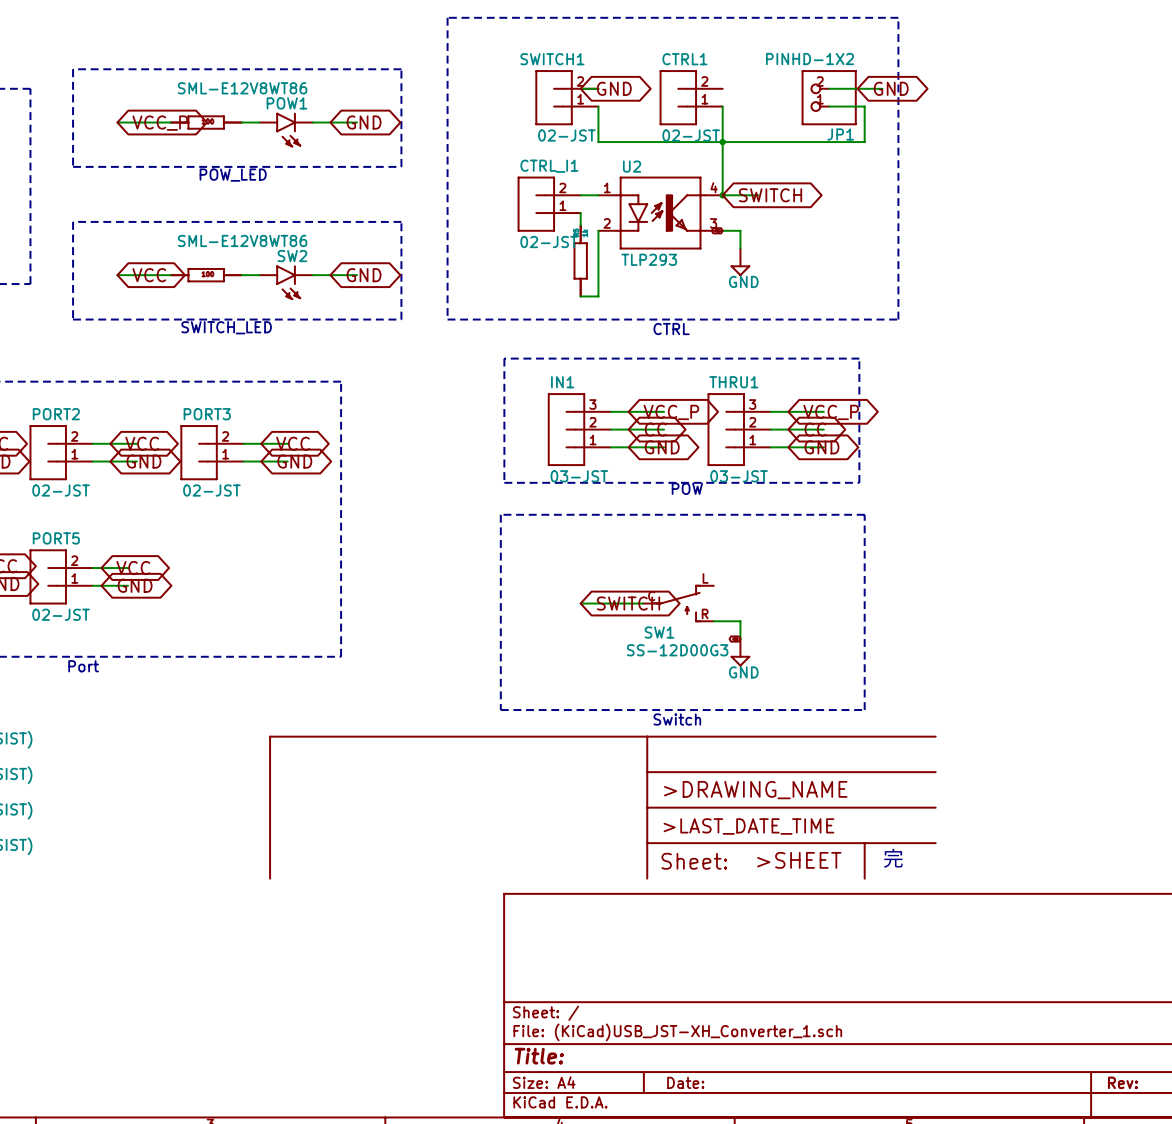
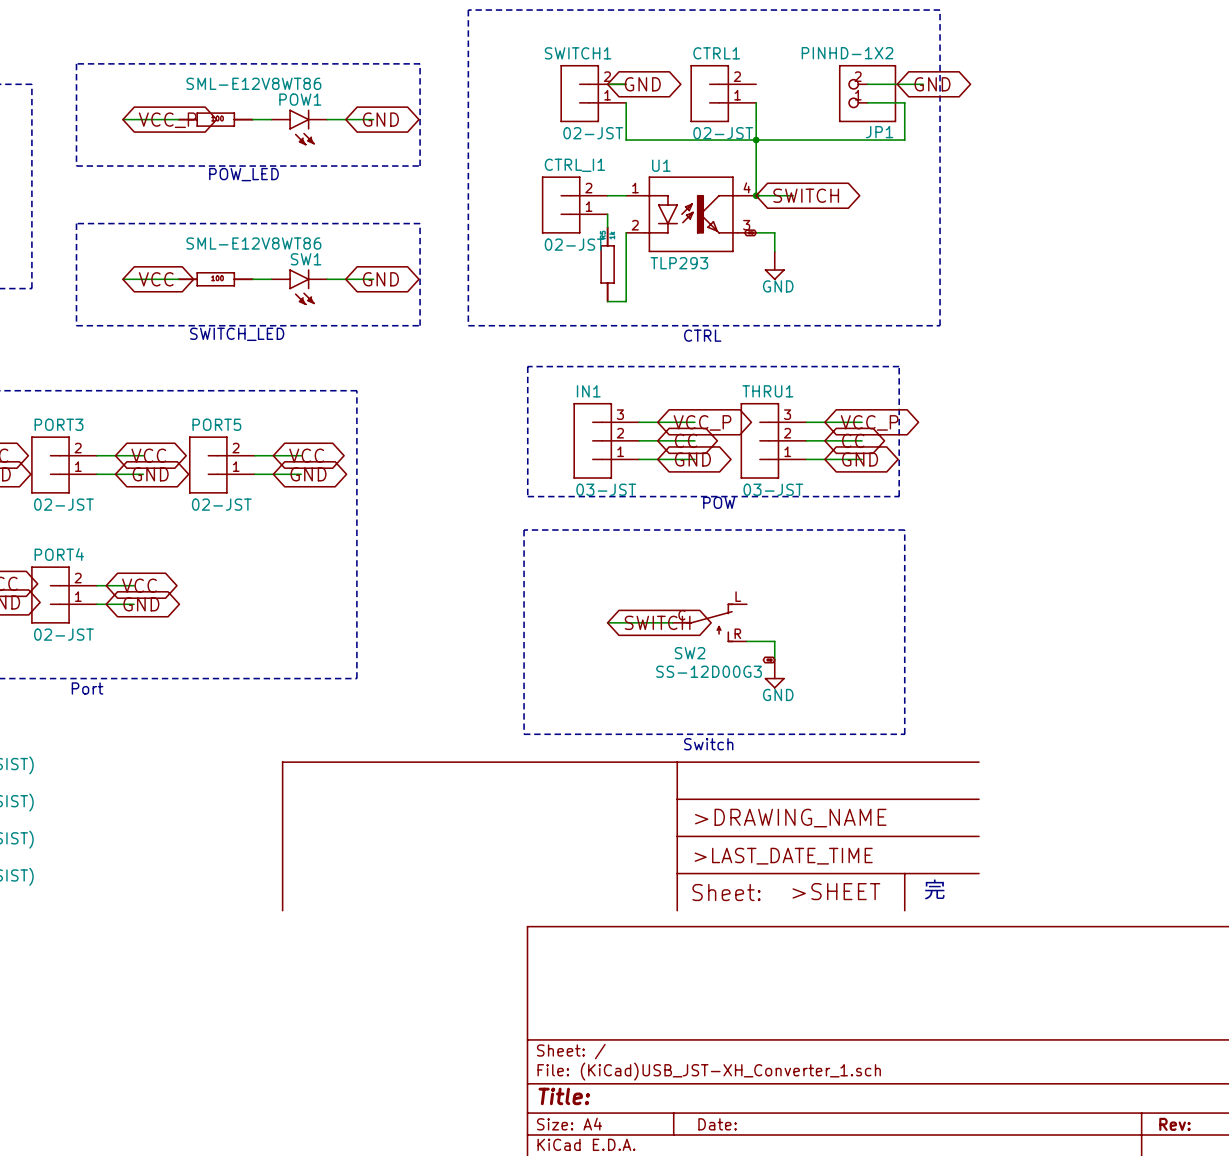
U2 name: U2 (632, 166) -> U1 (661, 165)
SW2 name: SW2 (292, 256) -> SW1 (306, 259)
PORT2 name: PORT2 (56, 414) -> PORT3 (59, 424)
PORT3 name: PORT3 (207, 414) -> PORT5 (216, 424)
PORT5 name: PORT5 (56, 538) -> PORT4 (59, 554)
SW1 name: SW1 (659, 632) -> SW2 (690, 653)

